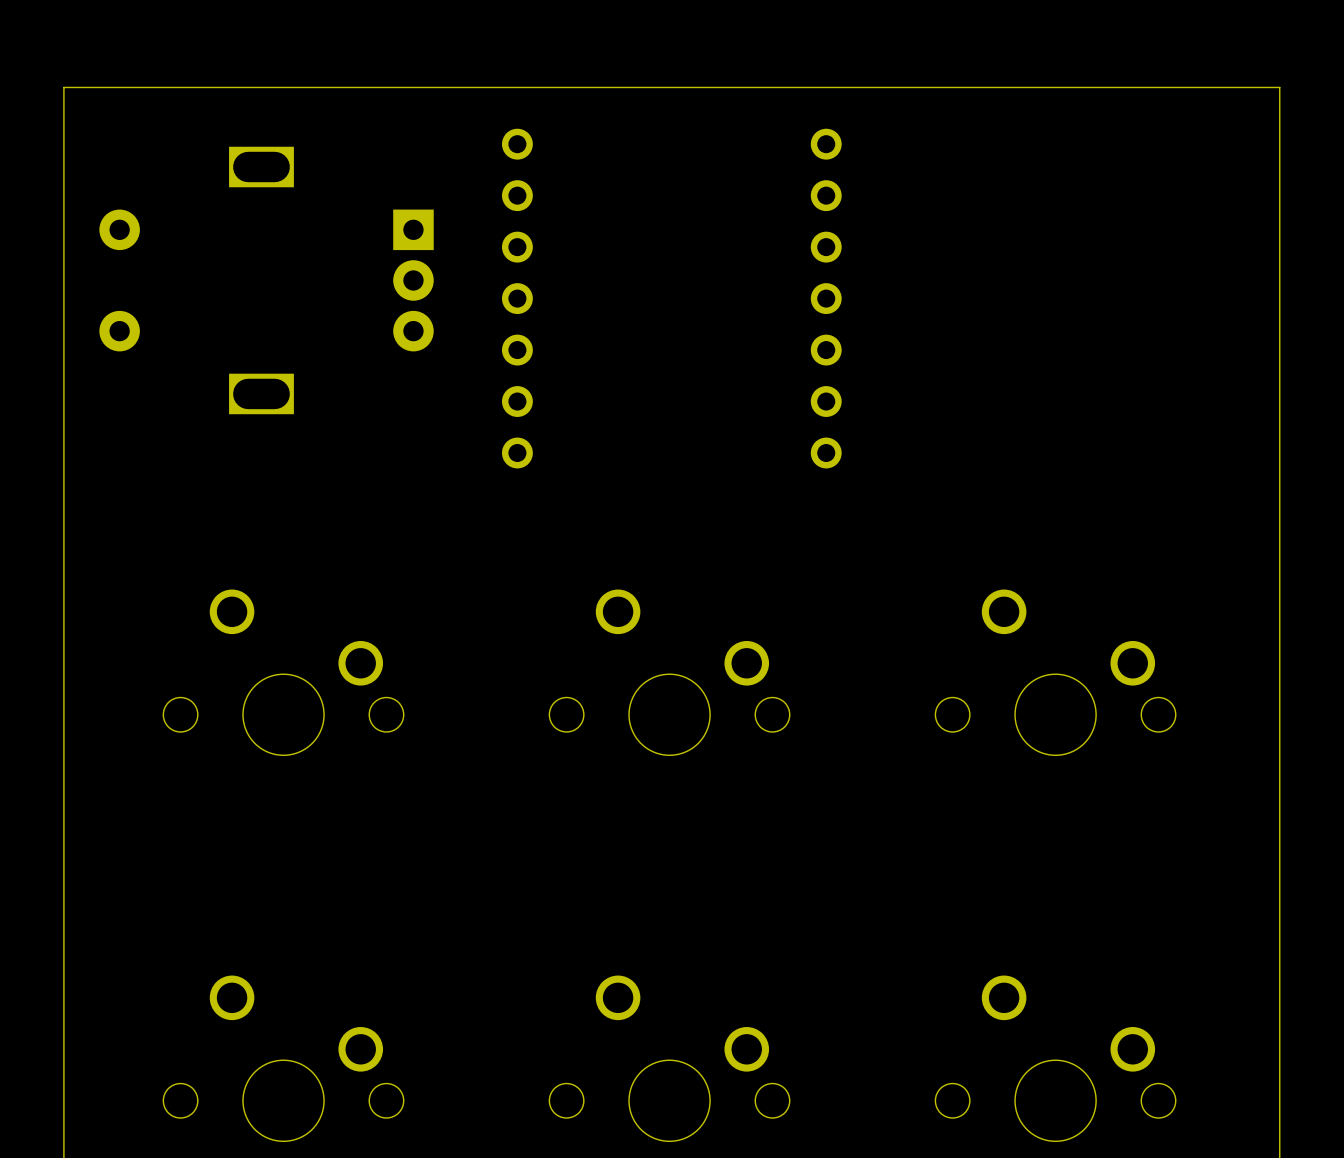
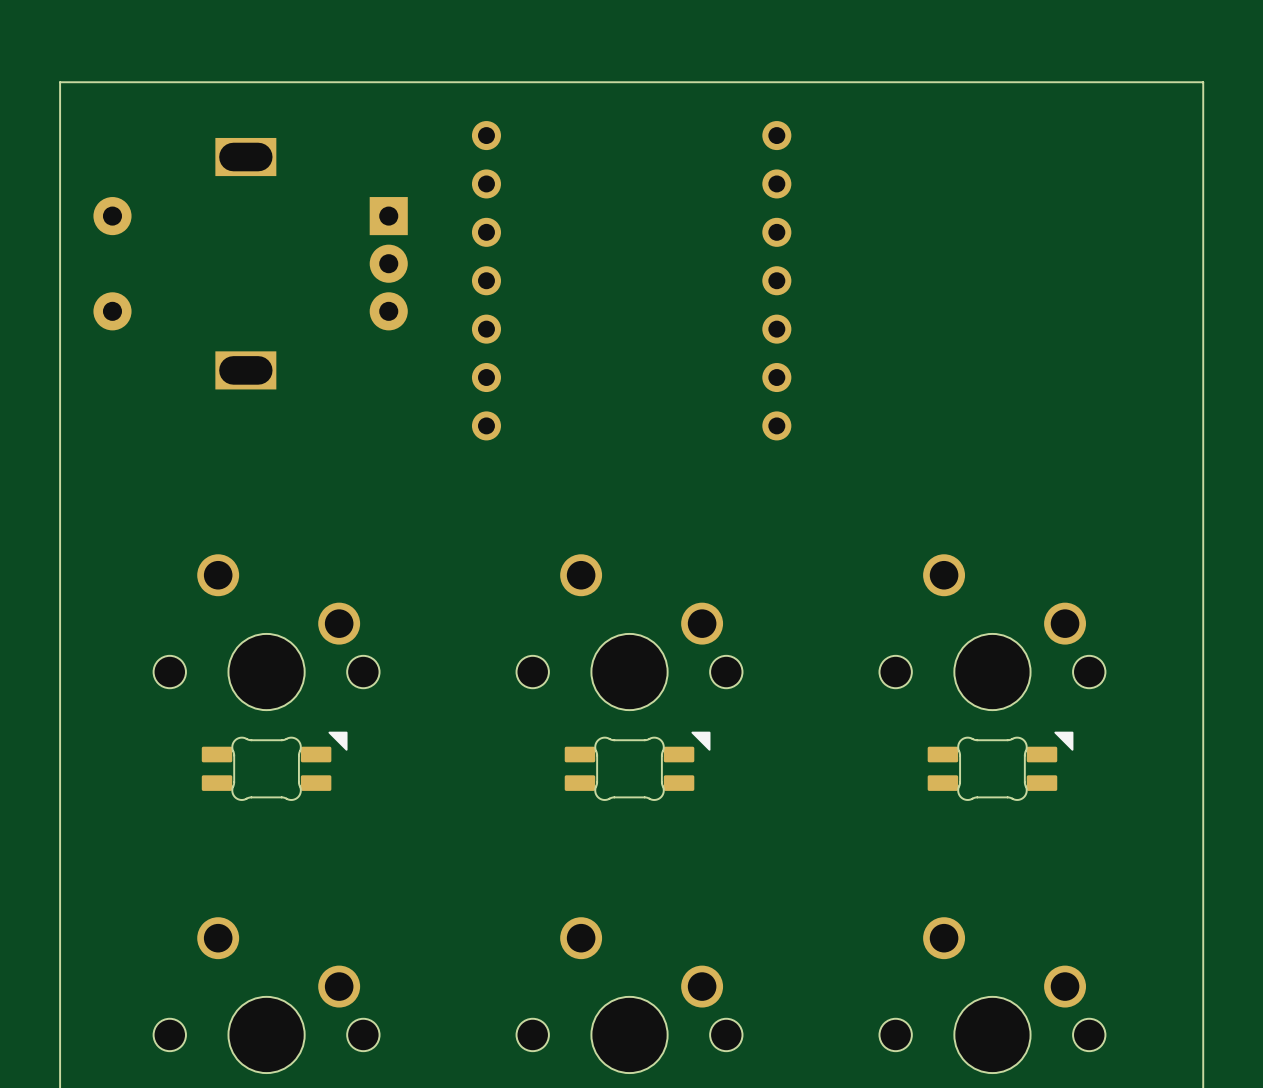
part: none -> (274, 766)
part: none -> (637, 766)
part: none -> (1000, 766)

